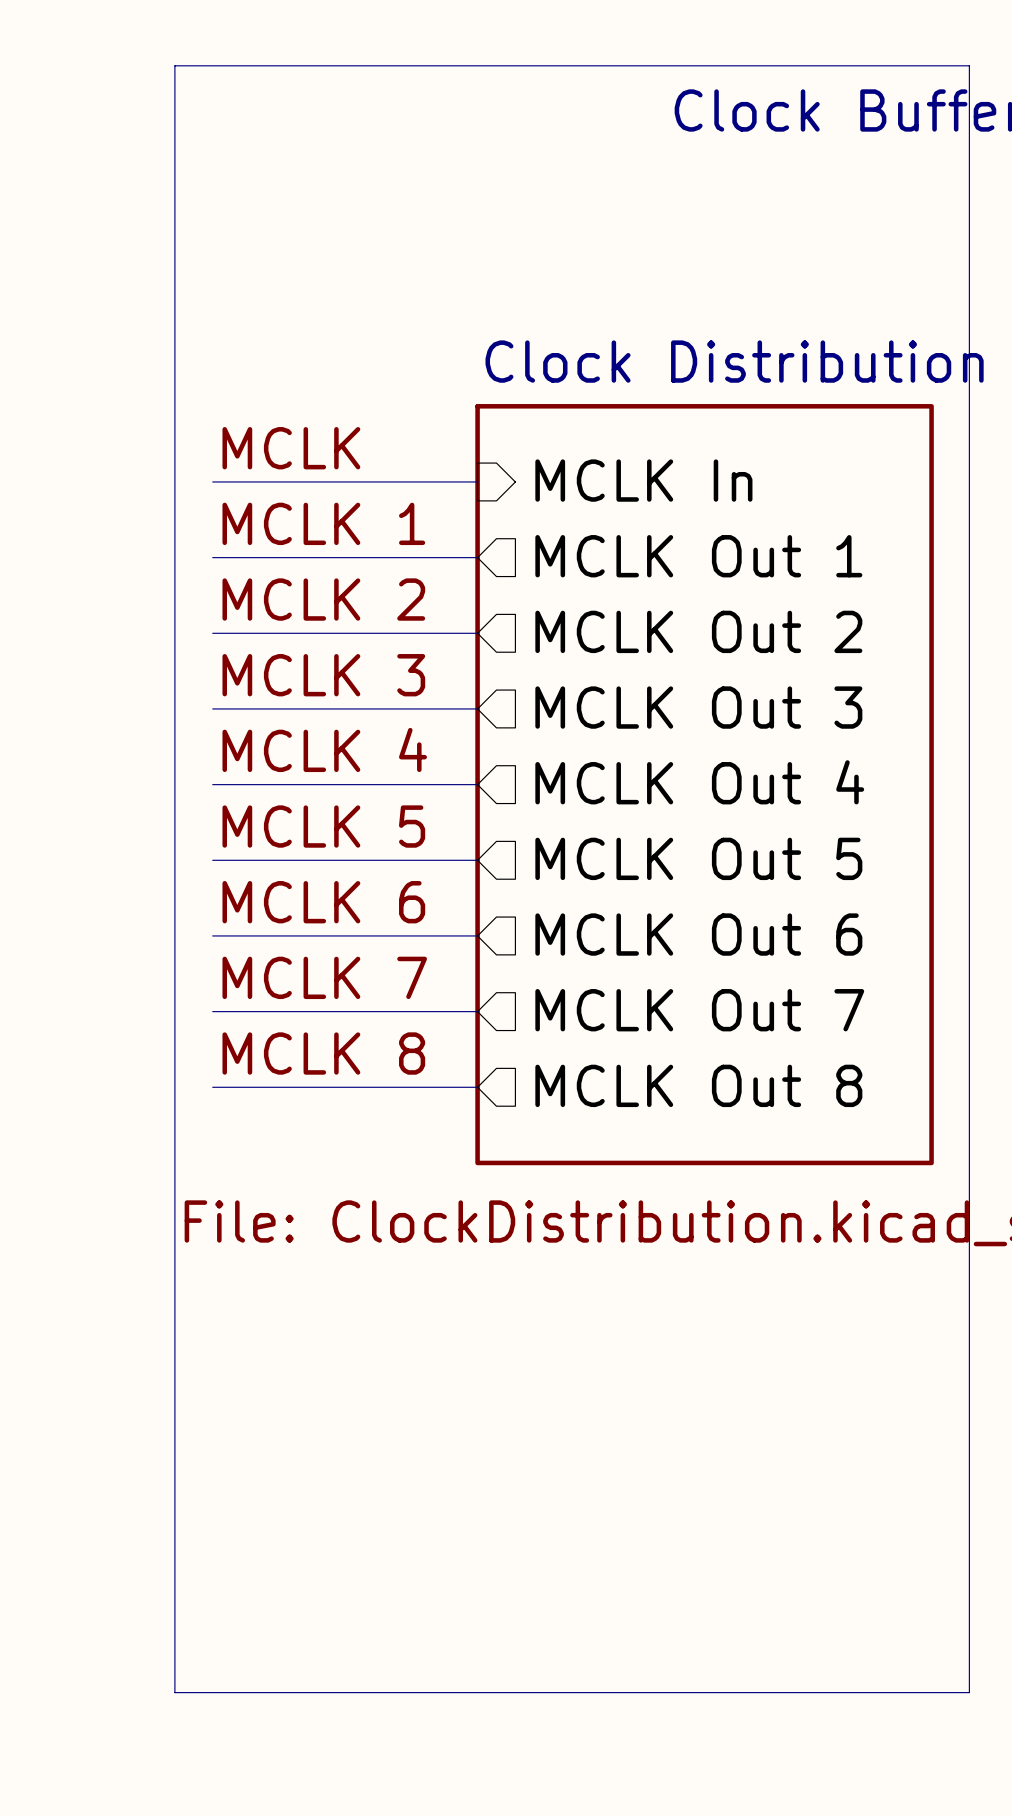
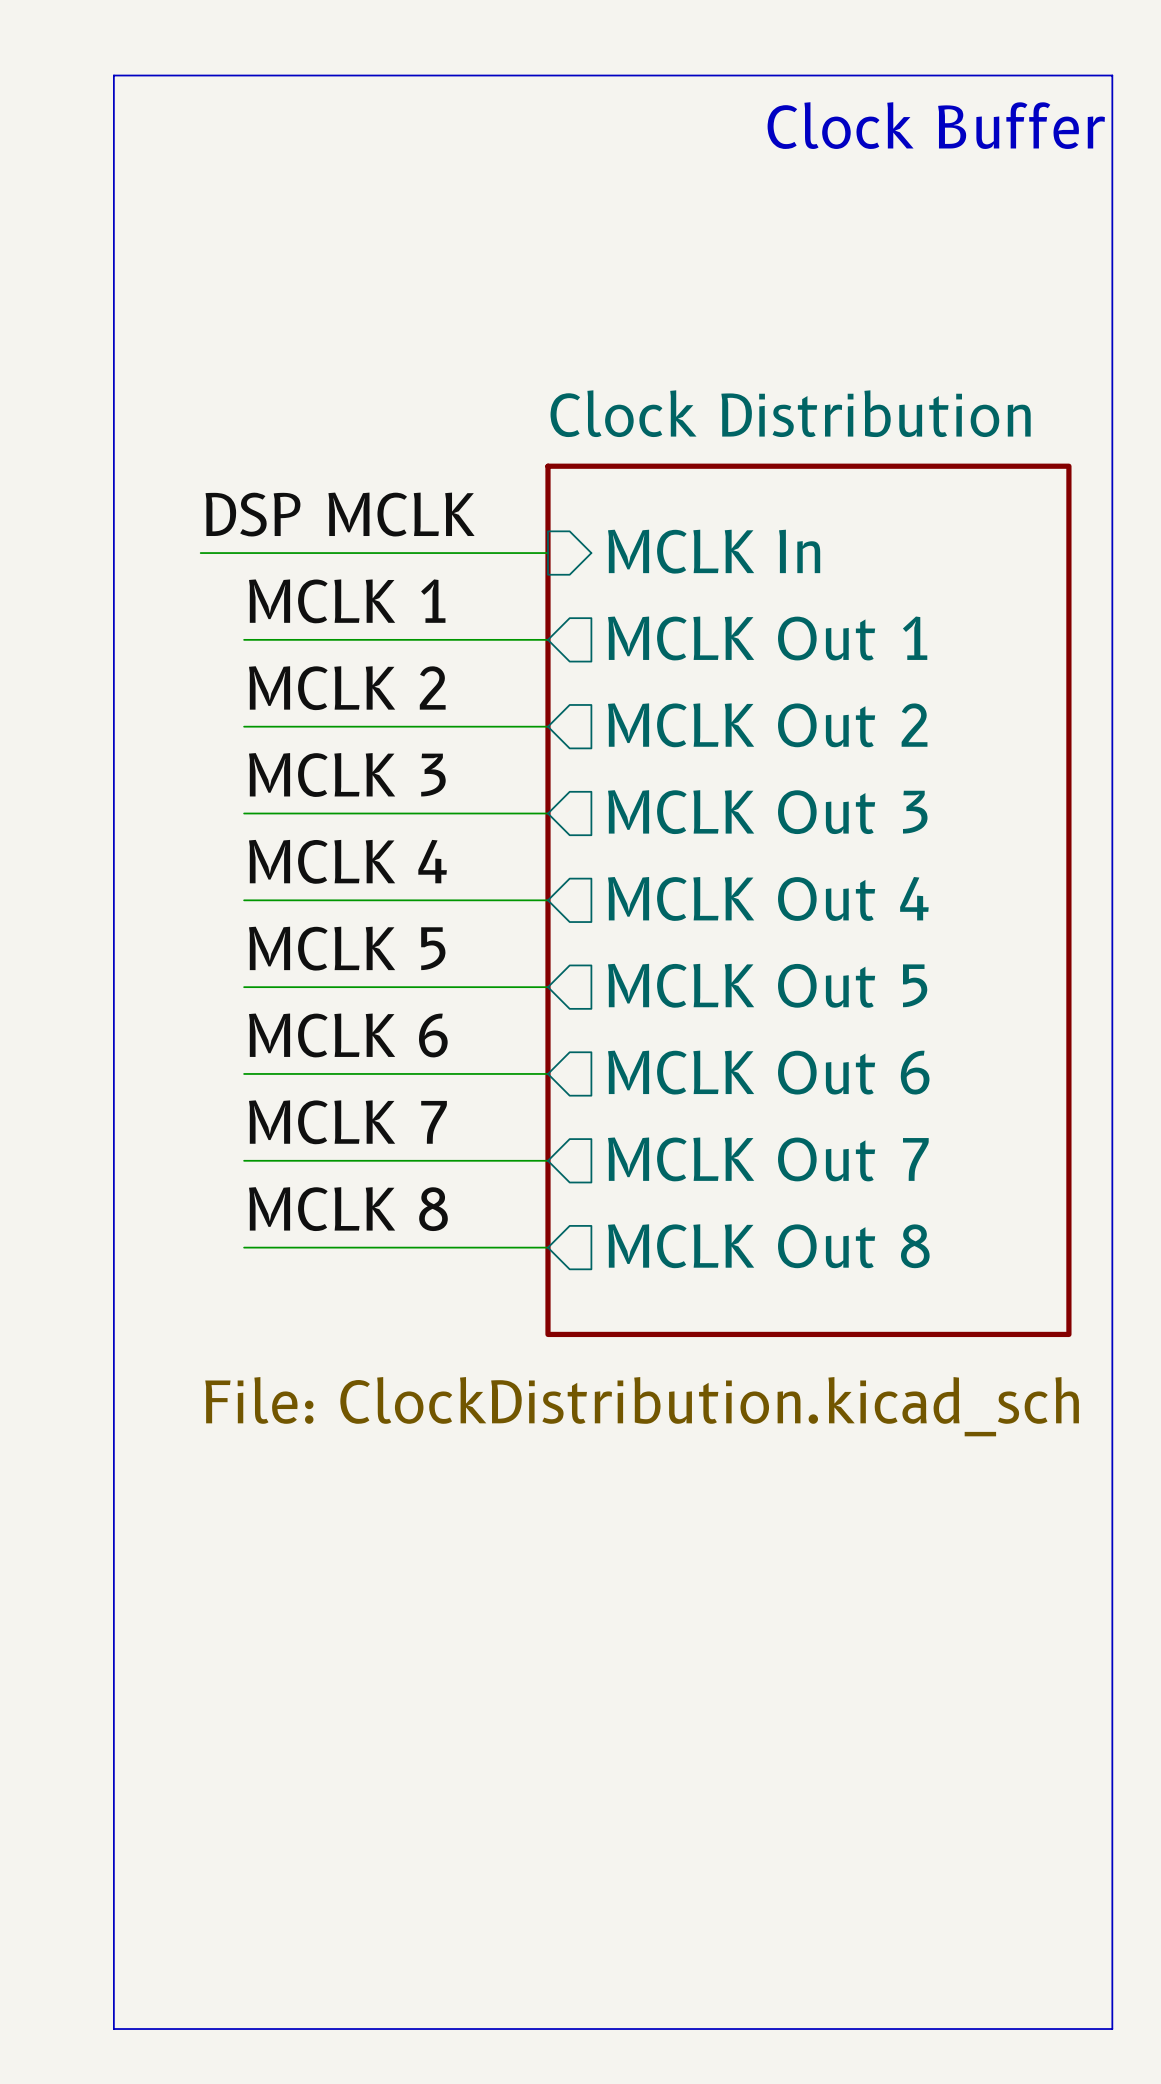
line: (174, 65) (174, 1692) (969, 1692) -> (200, 75) (113, 75) (113, 2029) (1112, 2029) (1112, 1942)
label: MCLK (291, 448) -> DSP MCLK (340, 514)
wire: none -> (200, 553) (244, 553)

